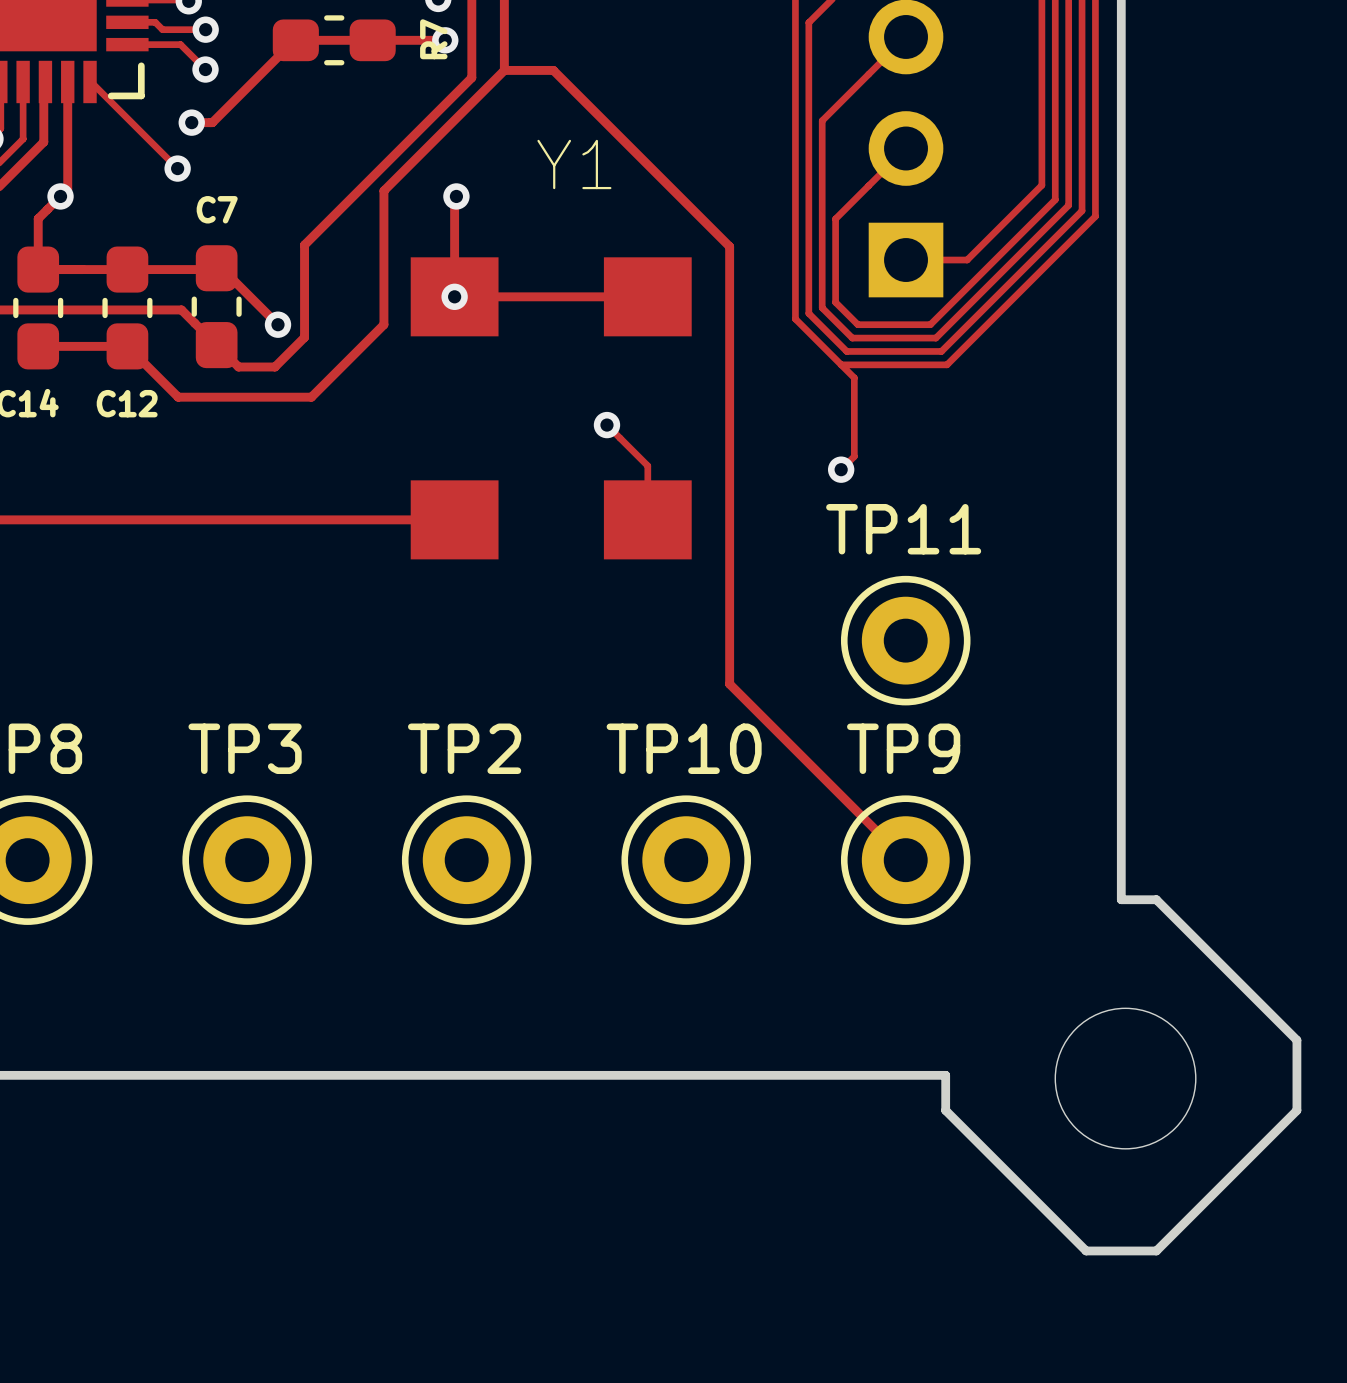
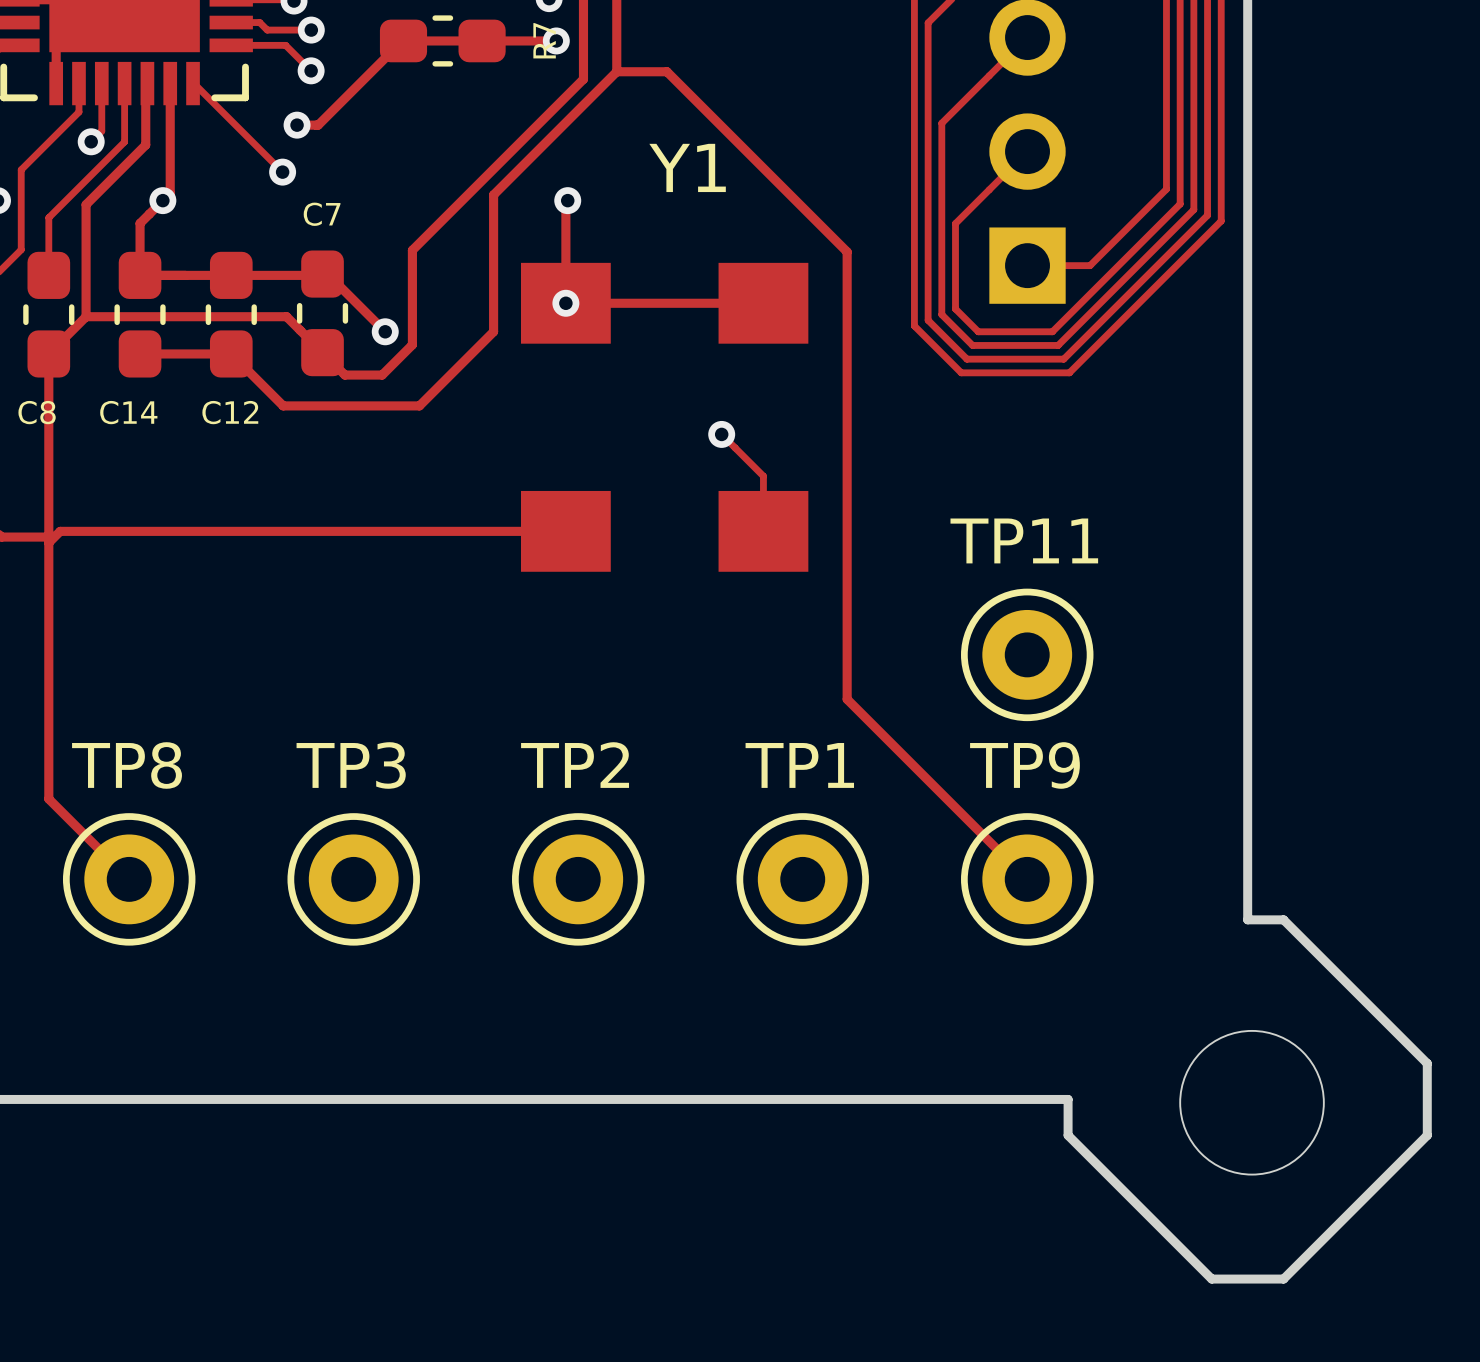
track: (841, 364) (854, 377) (854, 456) (841, 469) -> none
via: (841, 469) -> none
TP10 name: TP10 (684, 748) -> TP1 (799, 765)

